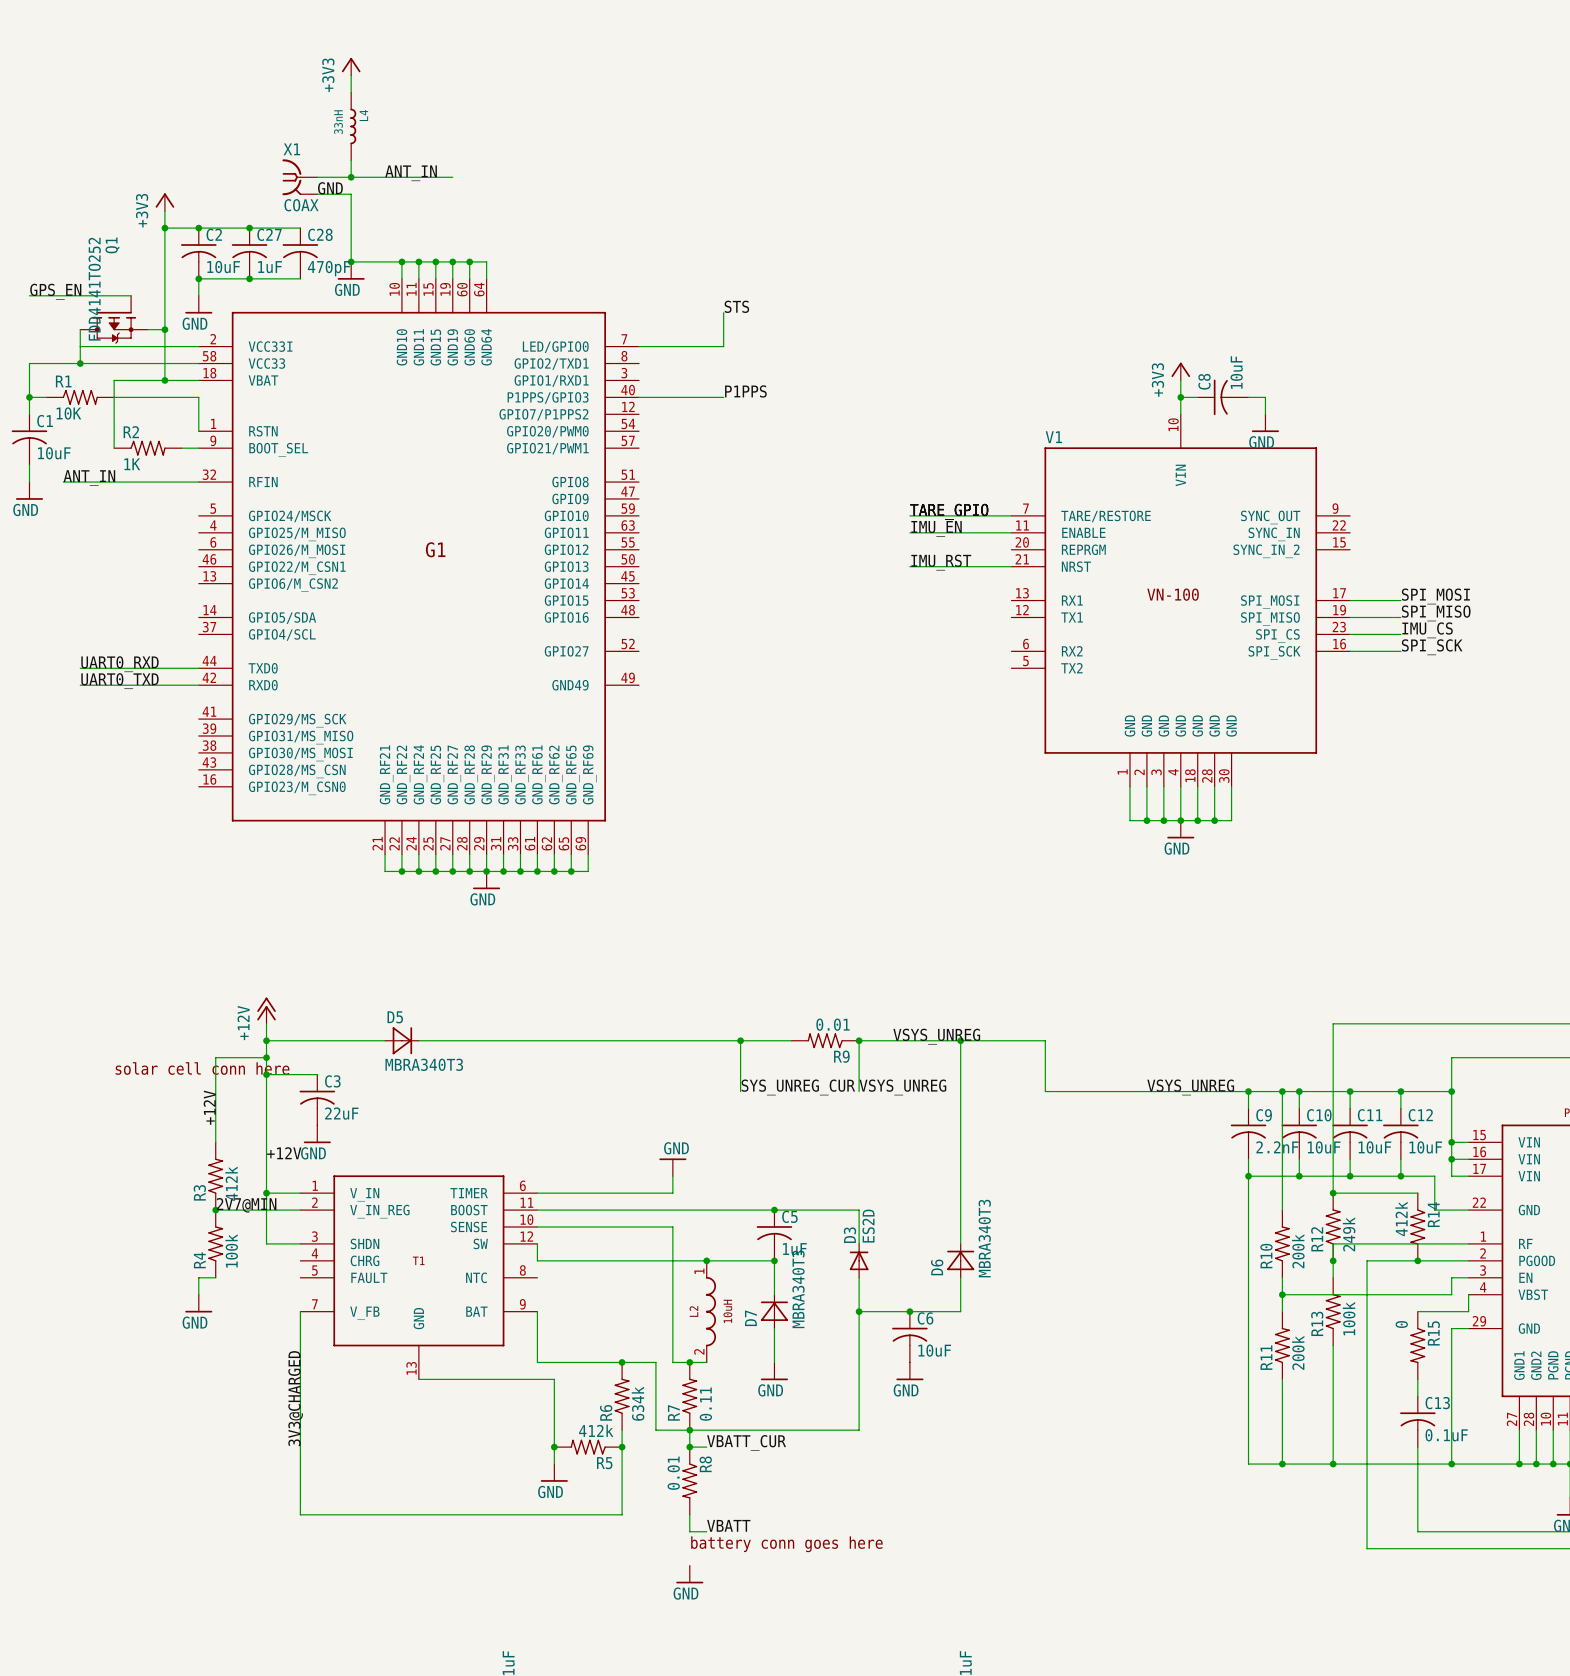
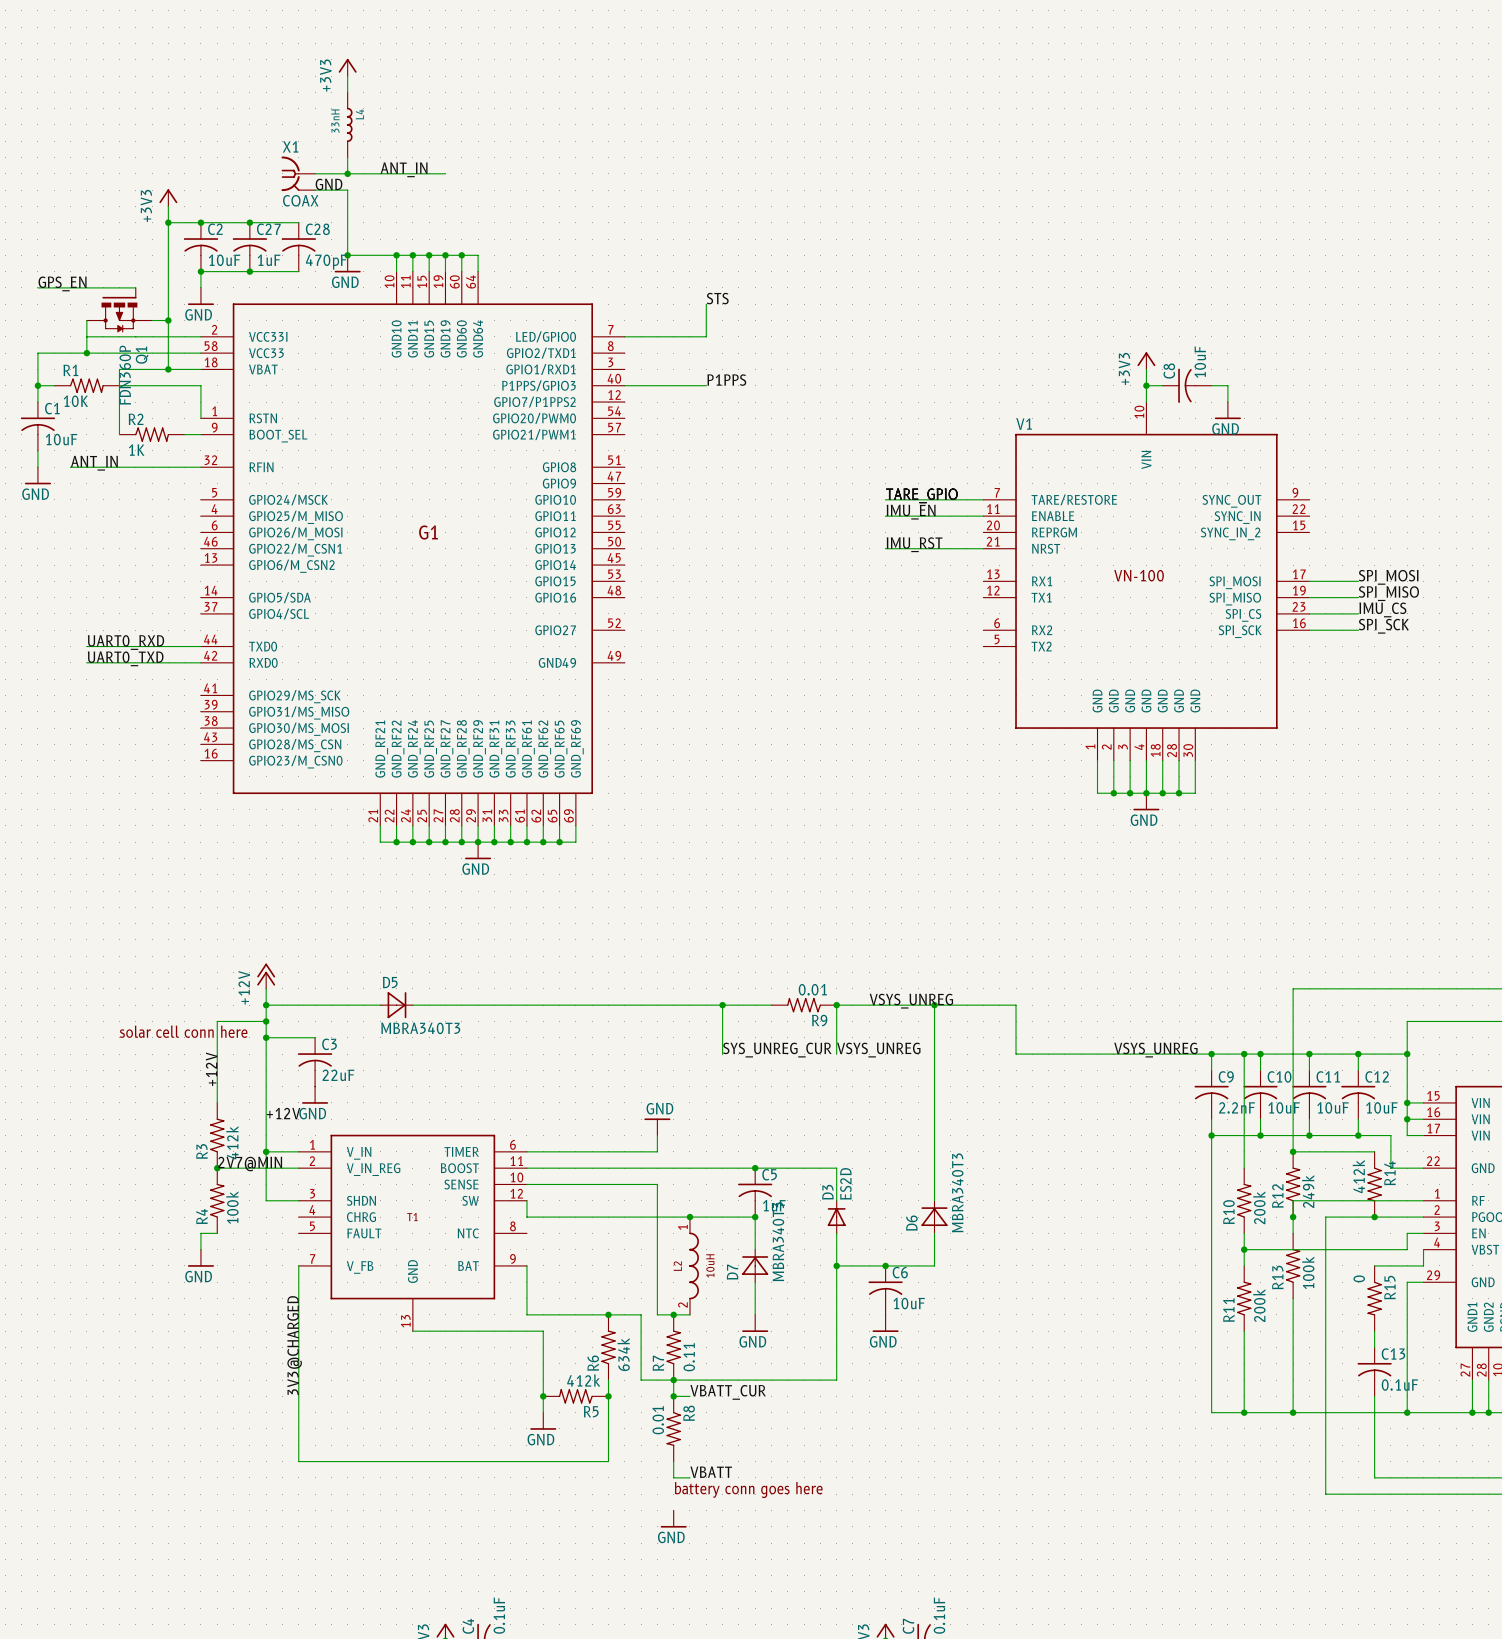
Q1 name position: Q1 (112, 245) -> Q1 (142, 355)
Q1 value: FDD4141TO252 (94, 289) -> FDN360P (125, 375)
Q1 symbol: [80, 295, 149, 344] -> [86, 287, 153, 333]

